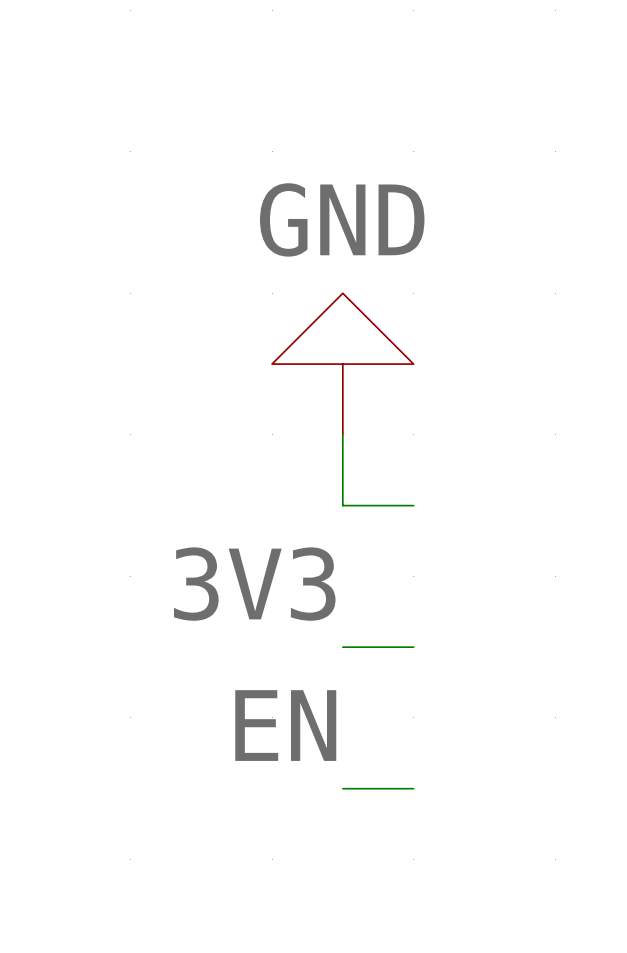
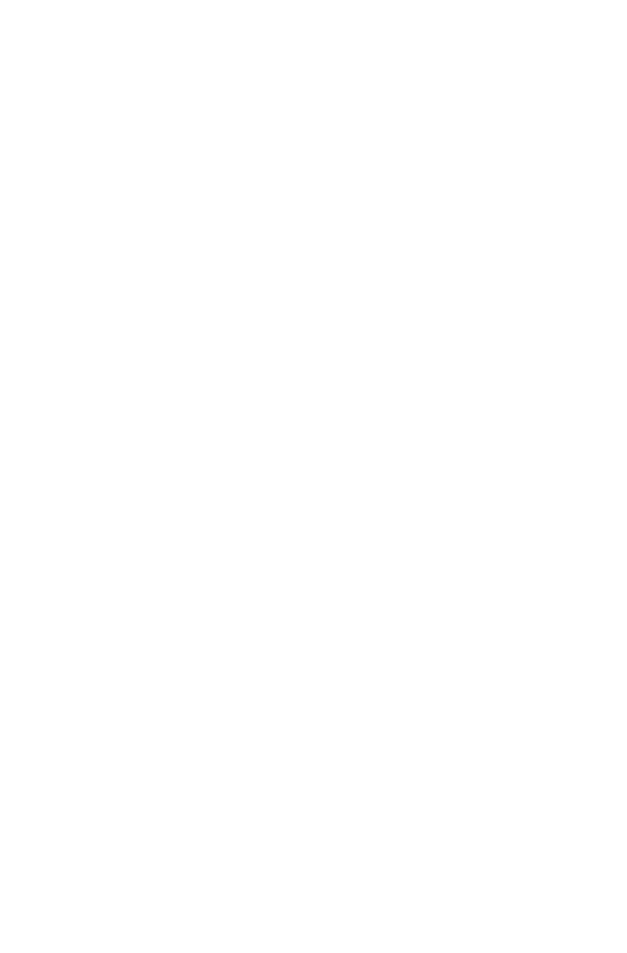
power symbol: GND (342, 364) -> none
wire: (342, 434) (342, 505) (413, 505) -> none
label: 3V3 (254, 584) -> none
wire: (342, 647) (413, 647) -> none
label: EN (285, 725) -> none
wire: (342, 788) (413, 788) -> none

